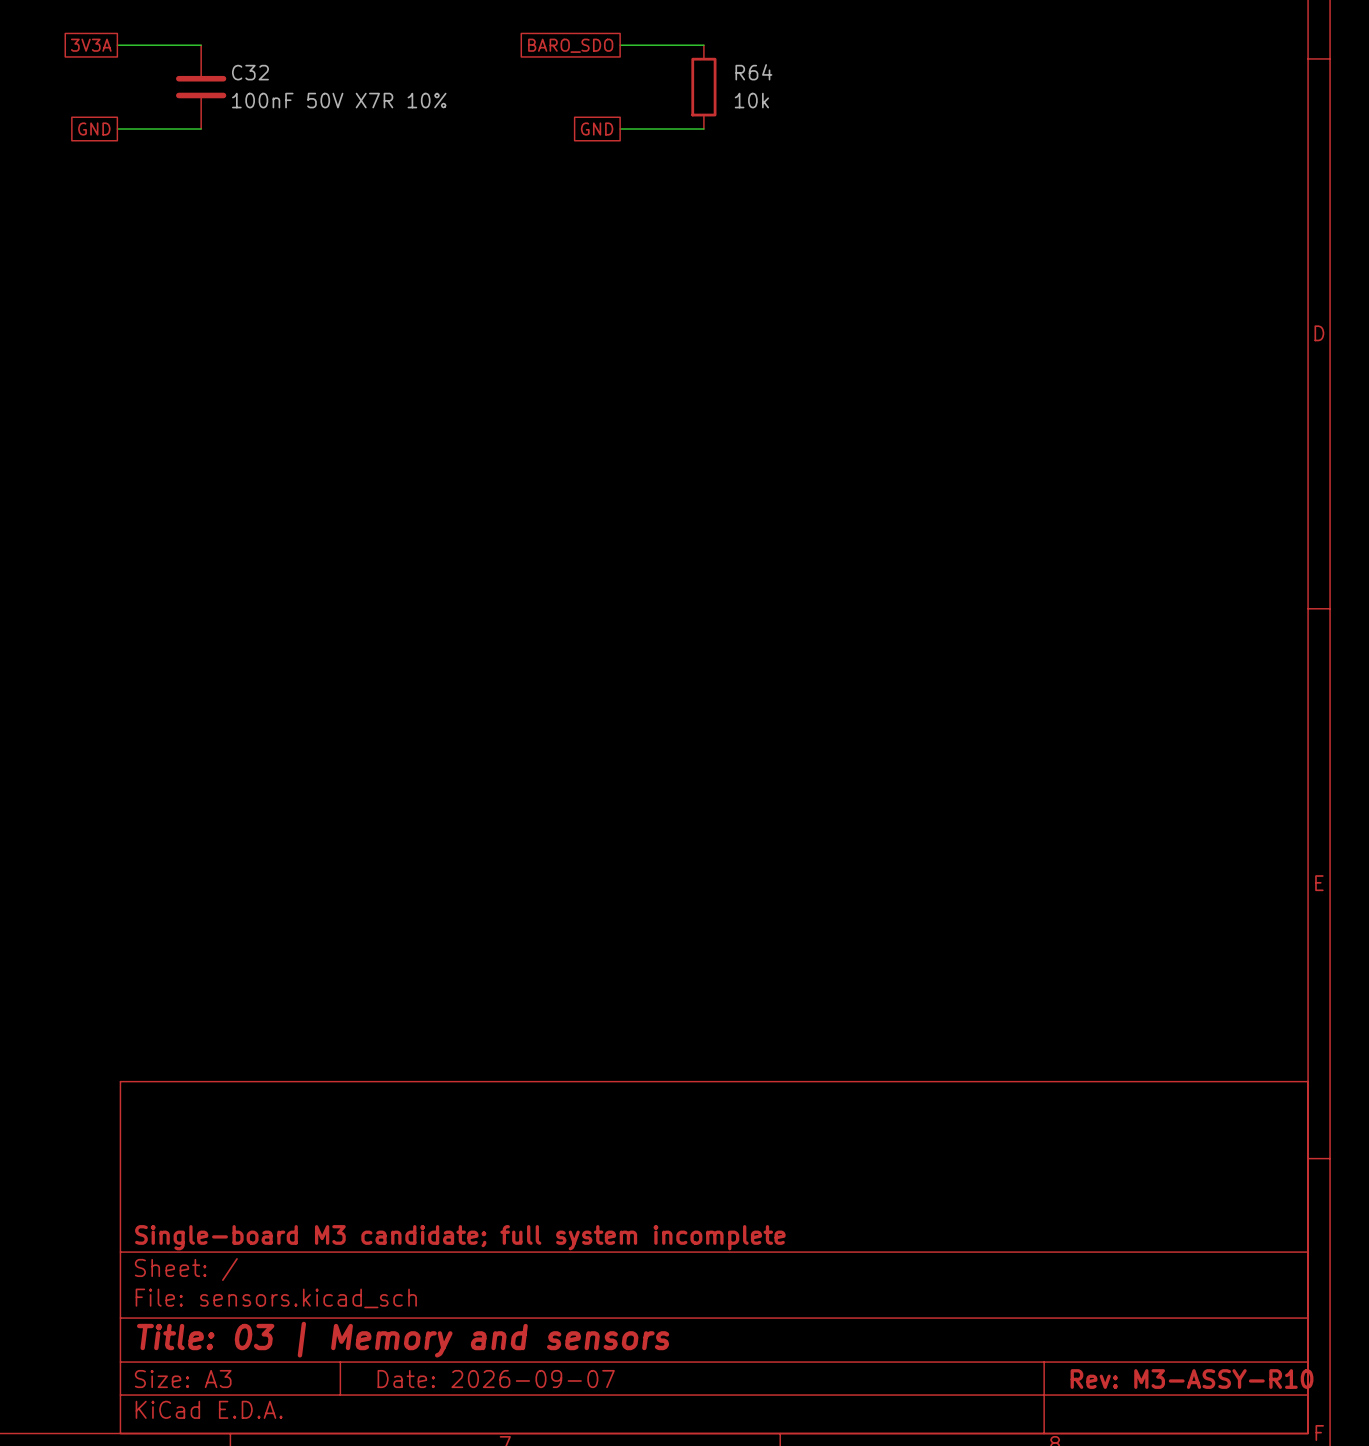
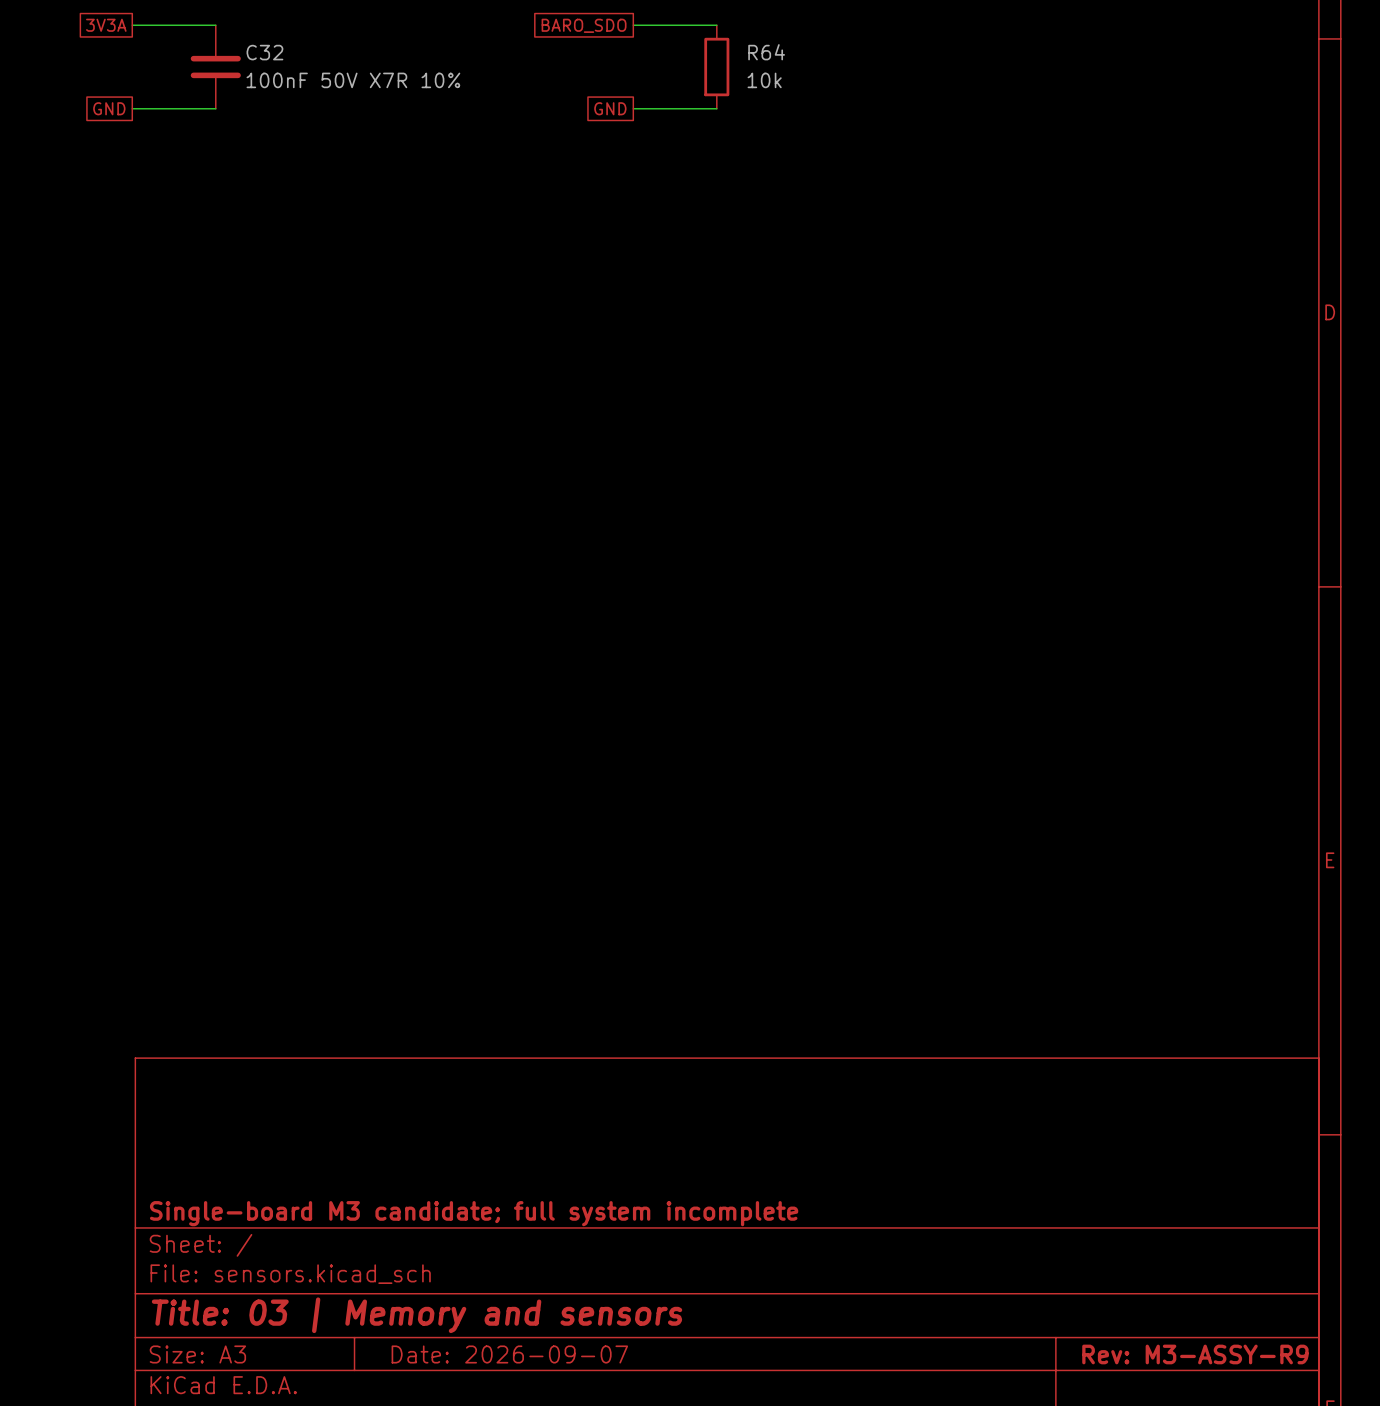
title block: Rev: M3-ASSY-R10 (1192, 1379) -> Rev: M3-ASSY-R9 (1195, 1354)

